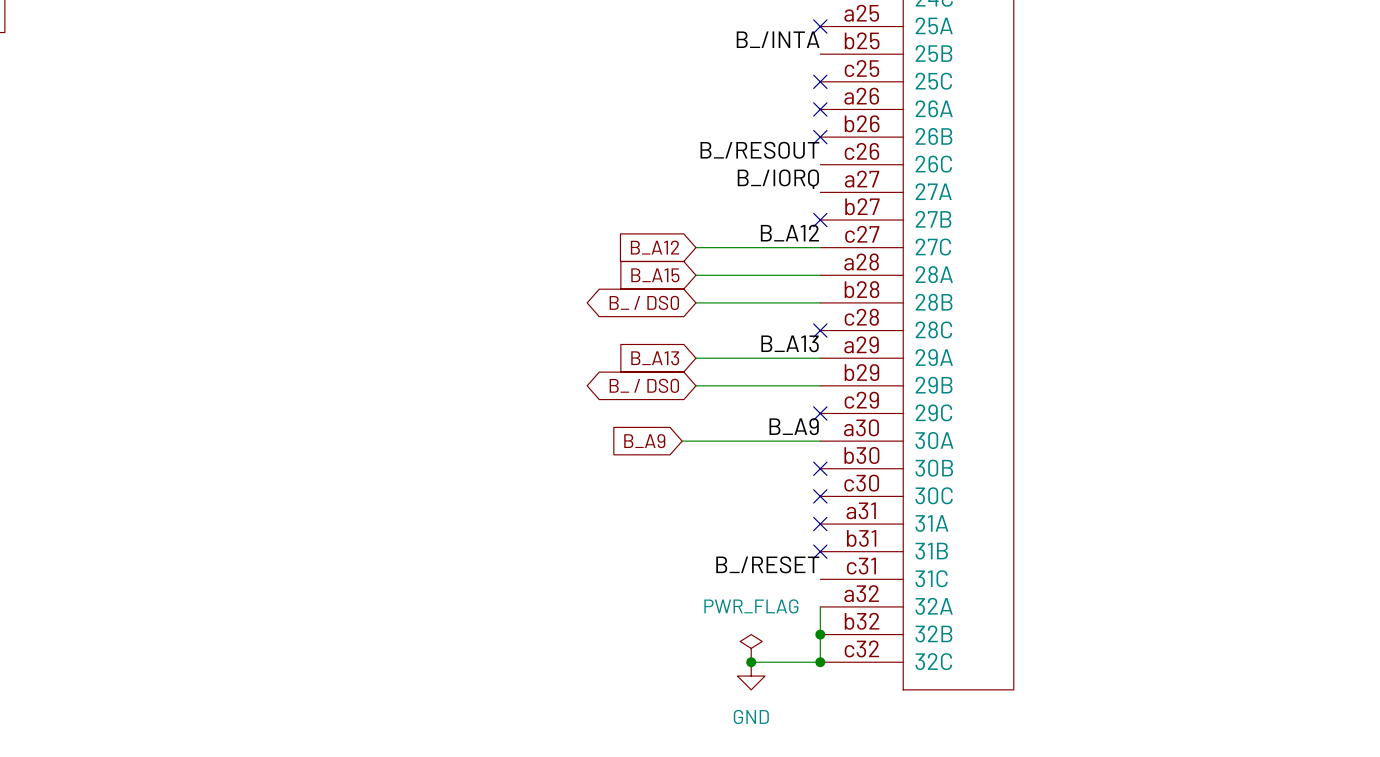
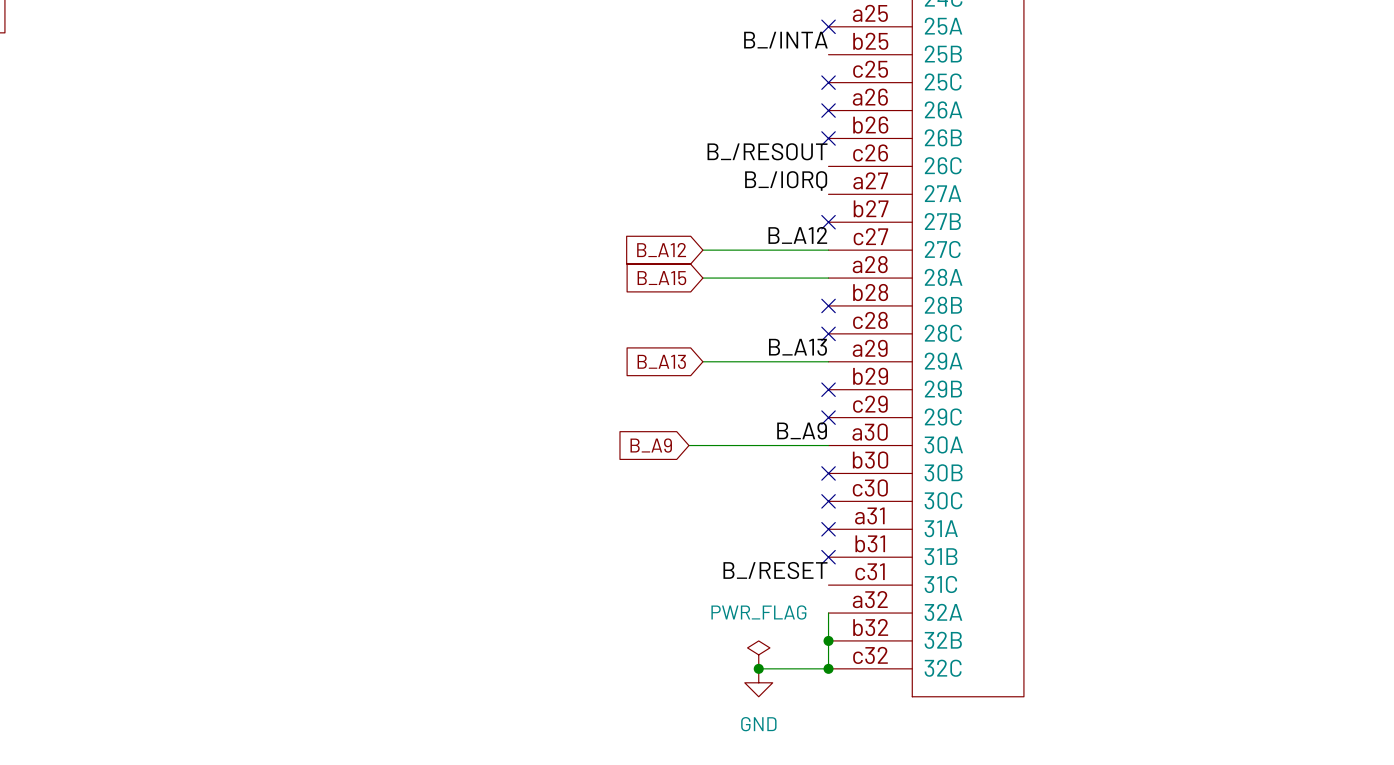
global label: B_ / DS0 (644, 302) -> none
wire: (695, 302) (820, 302) -> none
no-connect mark: none -> (828, 305)
global label: B_ / DS0 (644, 385) -> none
wire: (695, 385) (820, 385) -> none
no-connect mark: none -> (828, 389)

